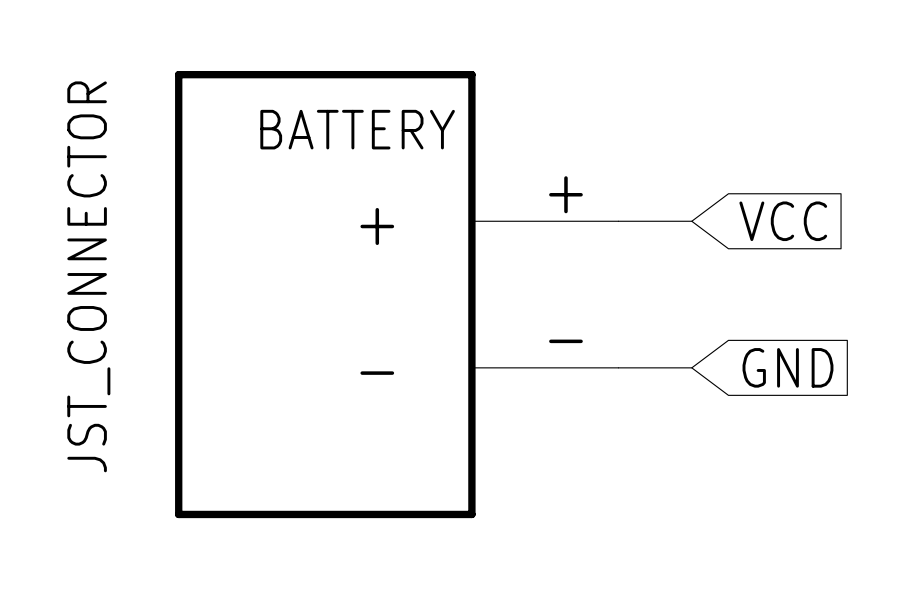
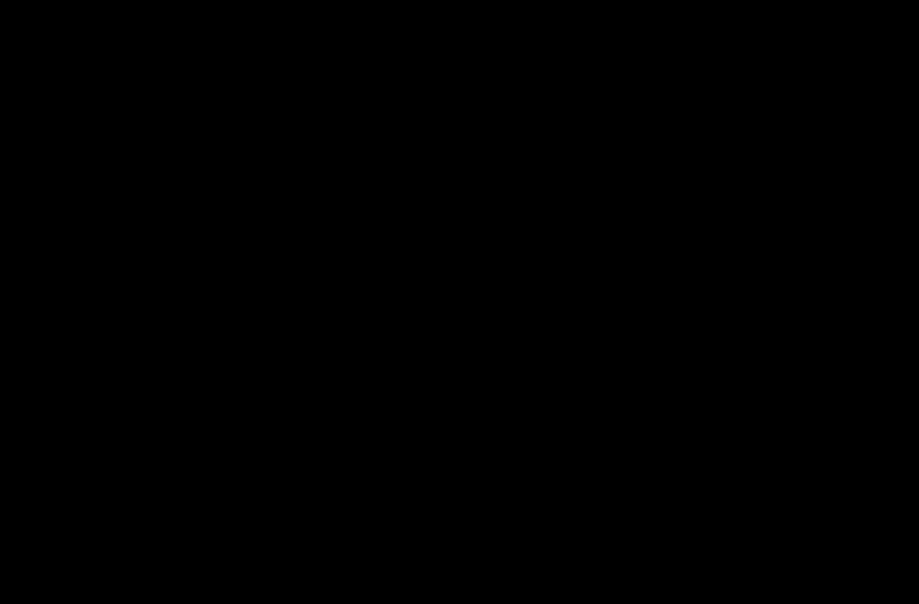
text: BATTERY (357, 129) -> none
wire: (618, 221) (691, 221) -> none
global label: VCC (783, 221) -> none
part: (396, 294) -> none
wire: (618, 367) (691, 367) -> none
global label: GND (787, 367) -> none

